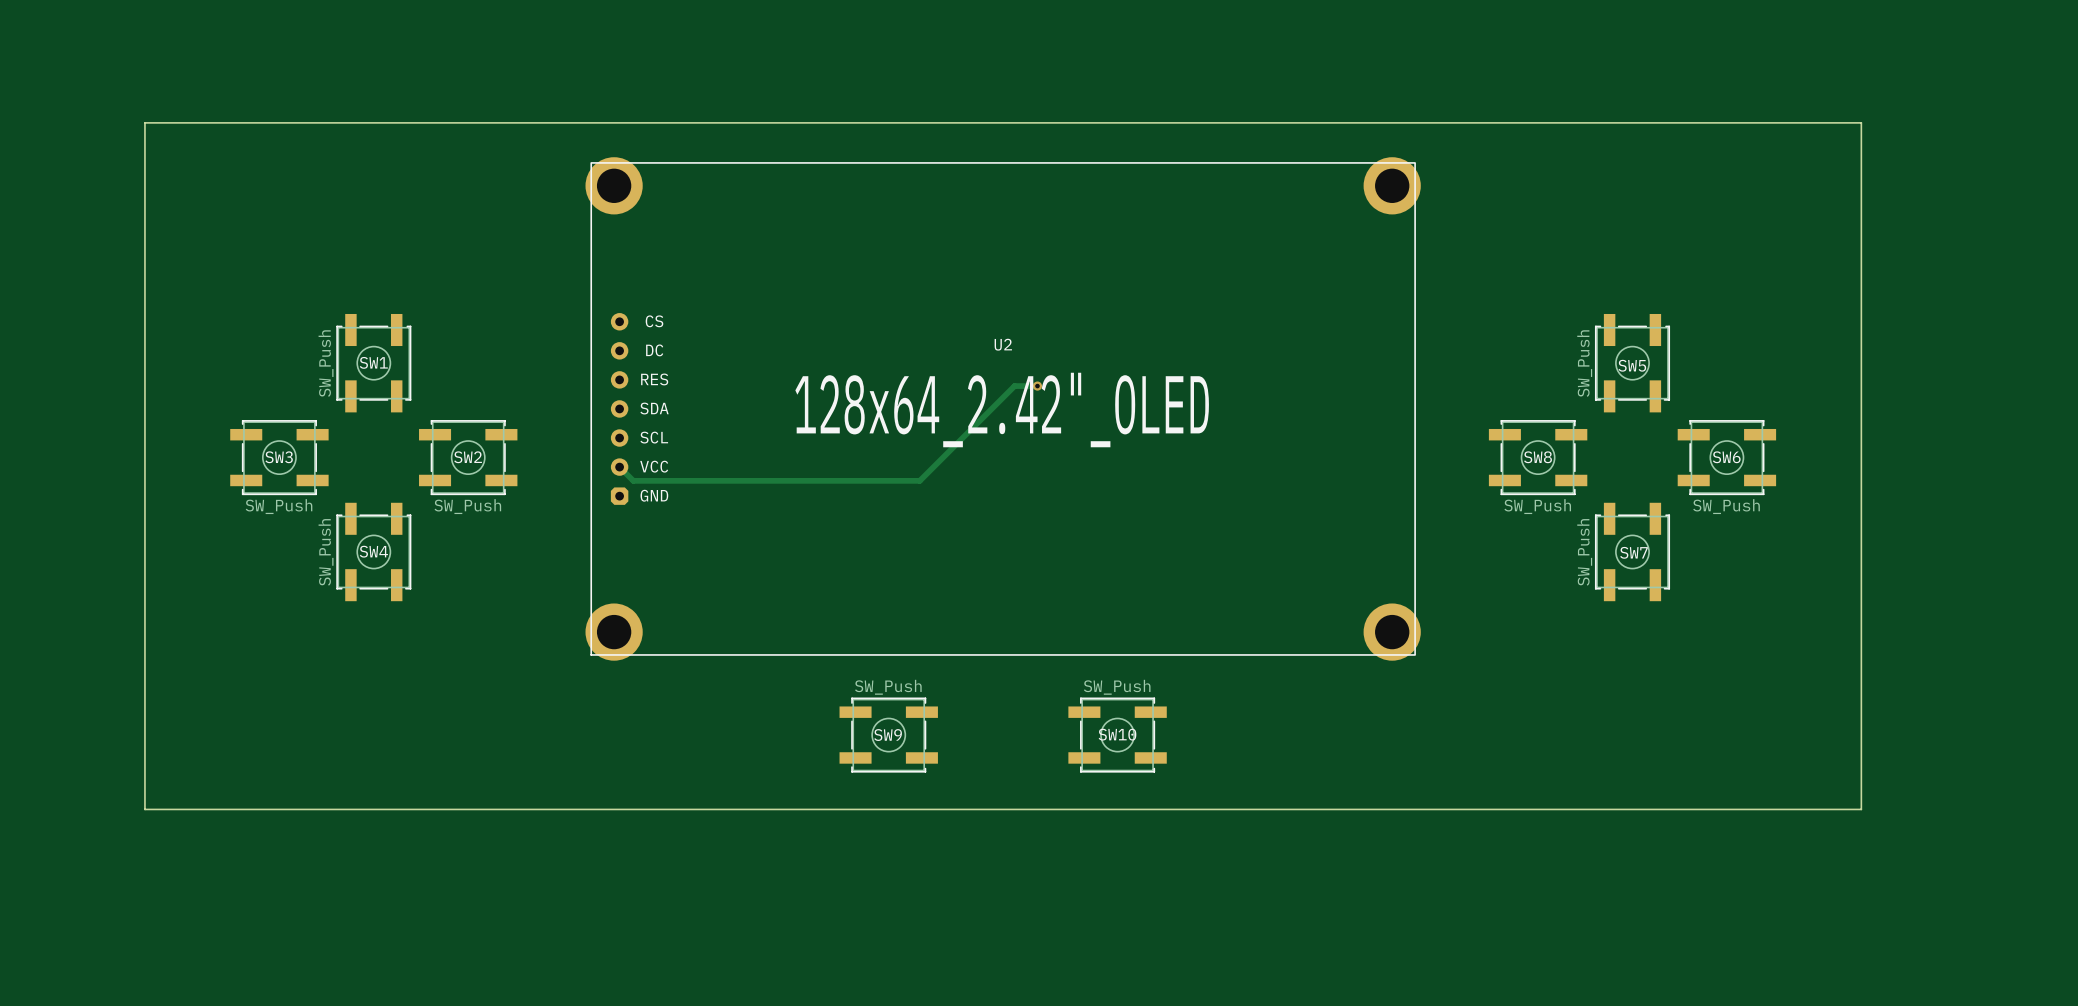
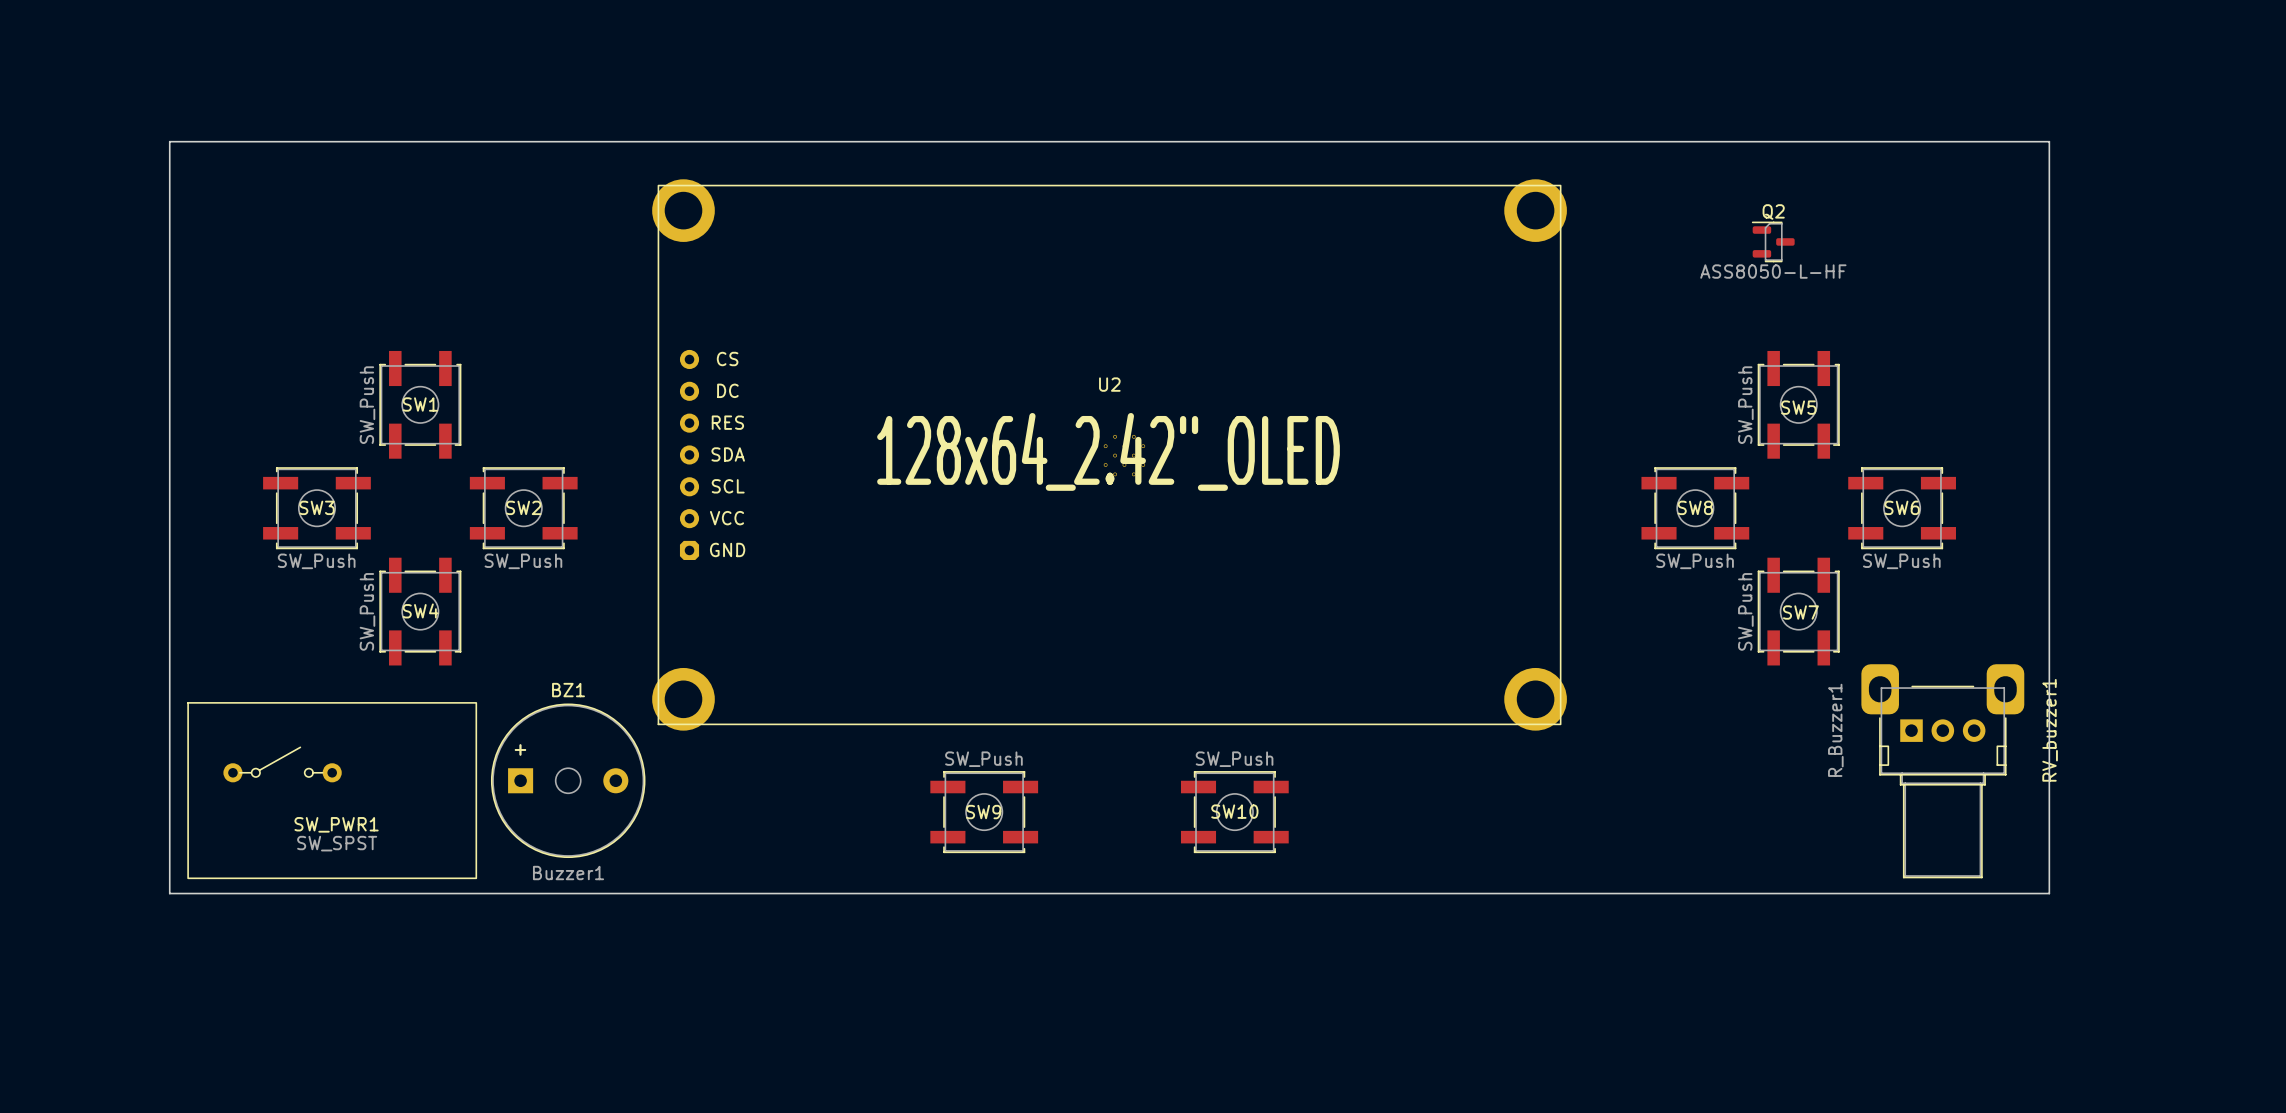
Q2: none -> ASS8050-L-HF (1773, 241)
track: (1037, 386) (1014, 386) (919, 480) (633, 480) (619, 467) -> none
via: (1037, 386) -> none
part: none -> (1124, 455)
RV_buzzer1: none -> R_Buzzer1 (1942, 771)
BZ1: none -> Buzzer1 (568, 780)
SW_PWR1: none -> SW_SPST (332, 790)

